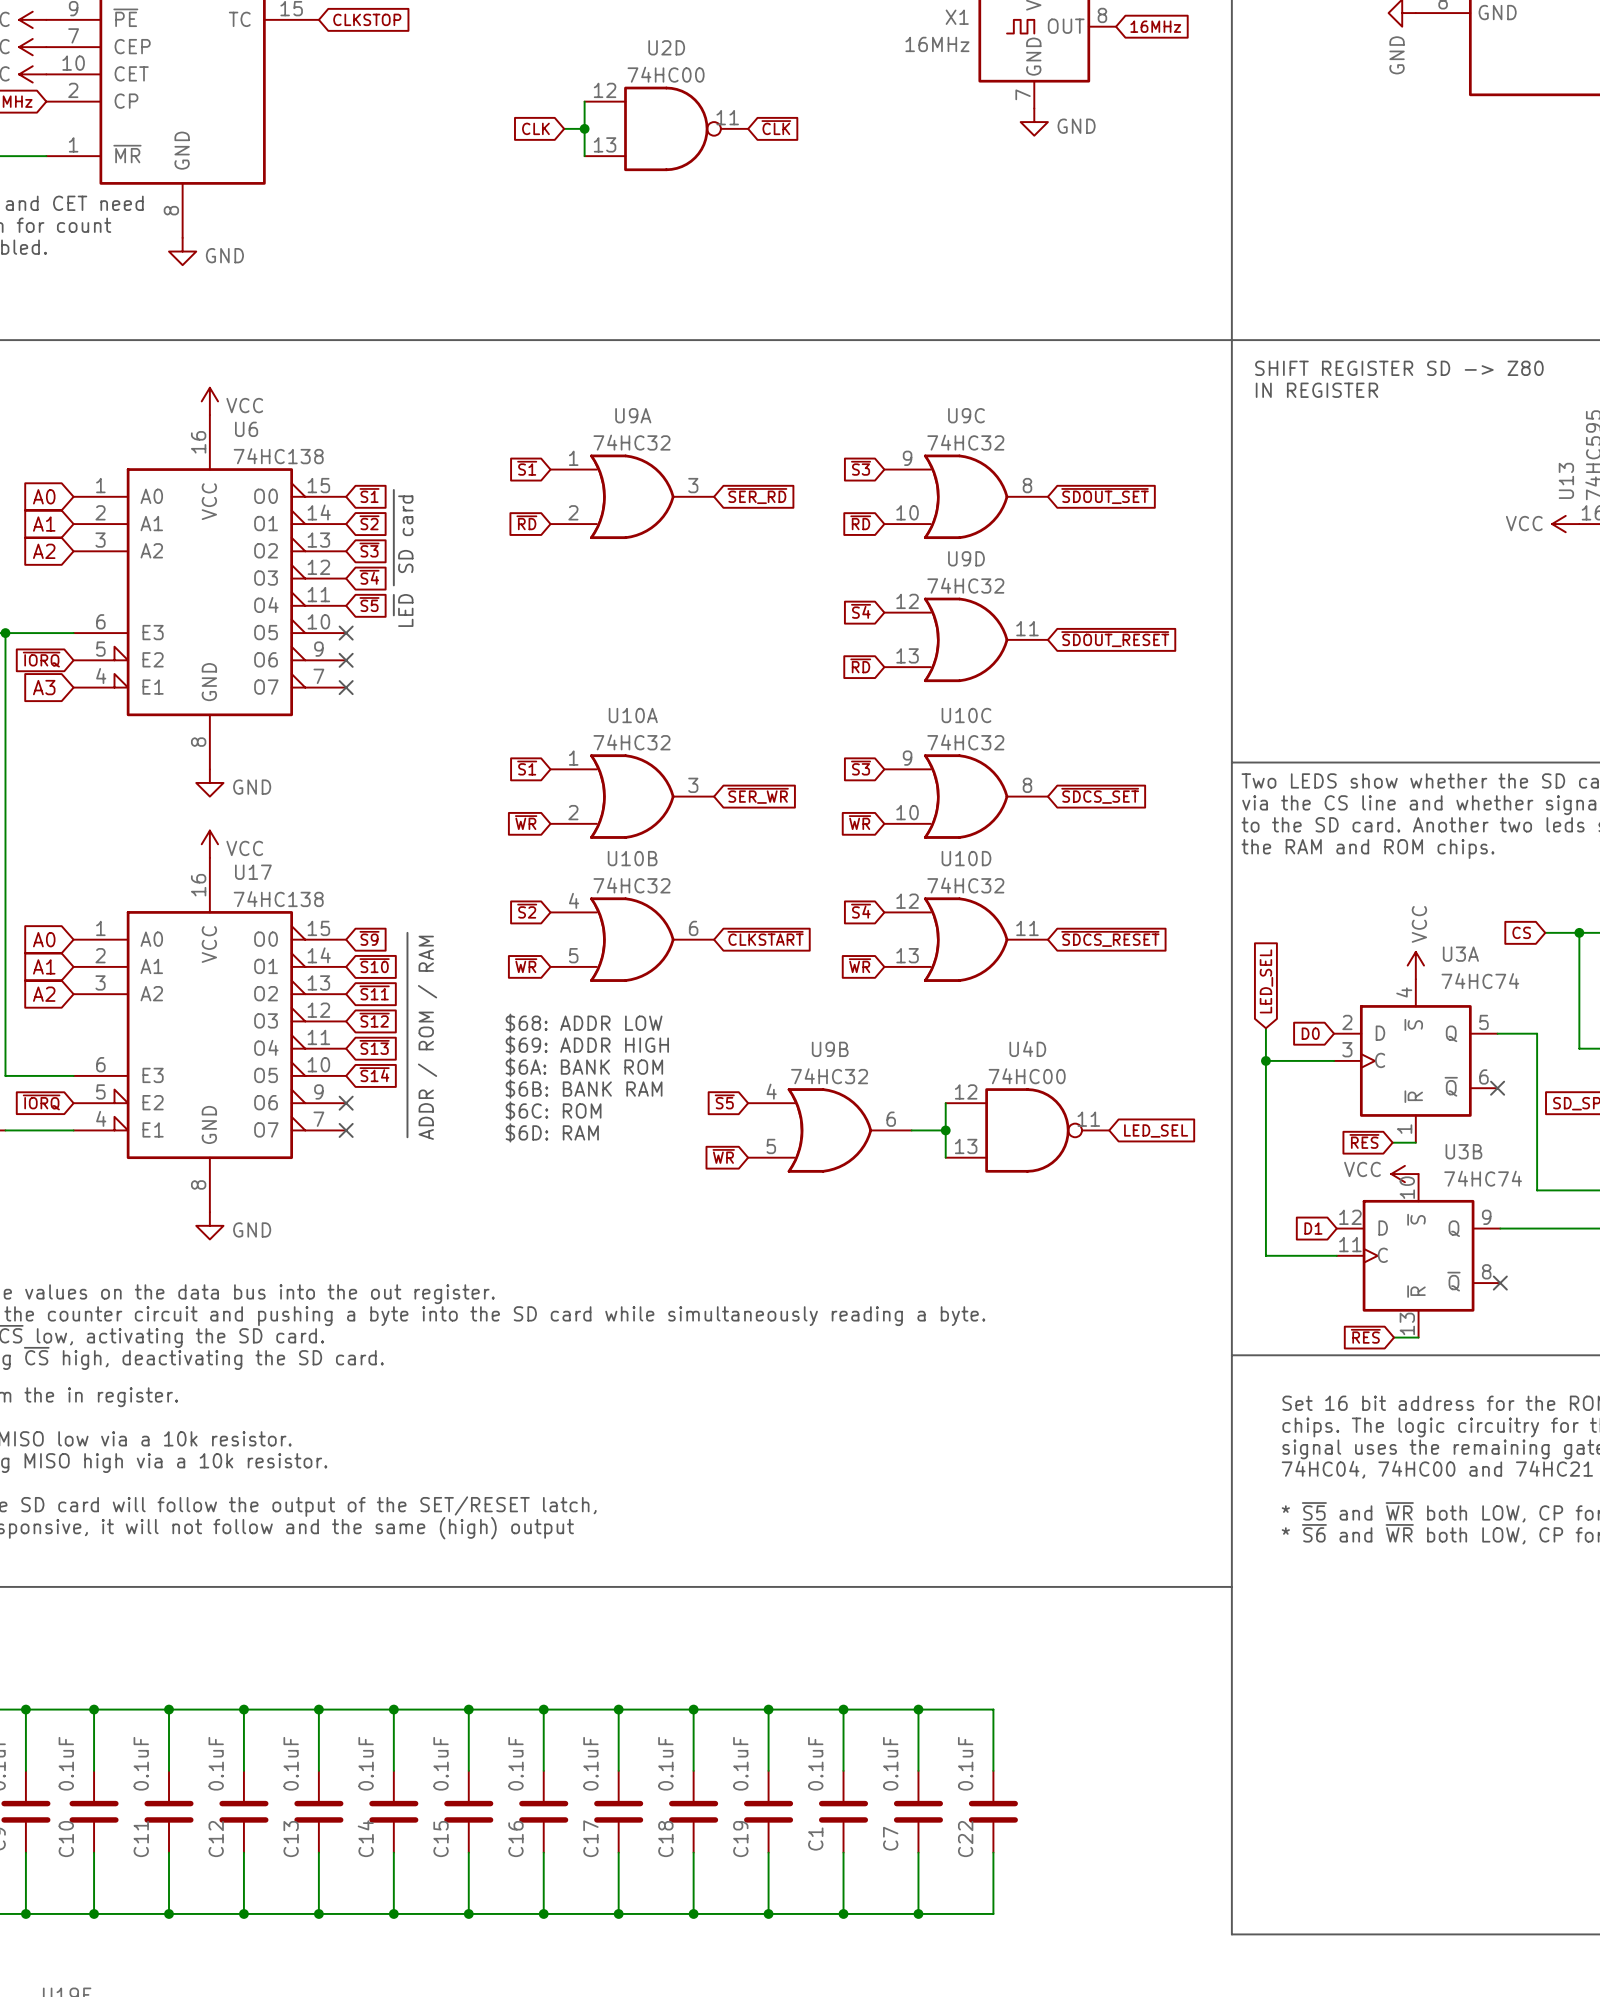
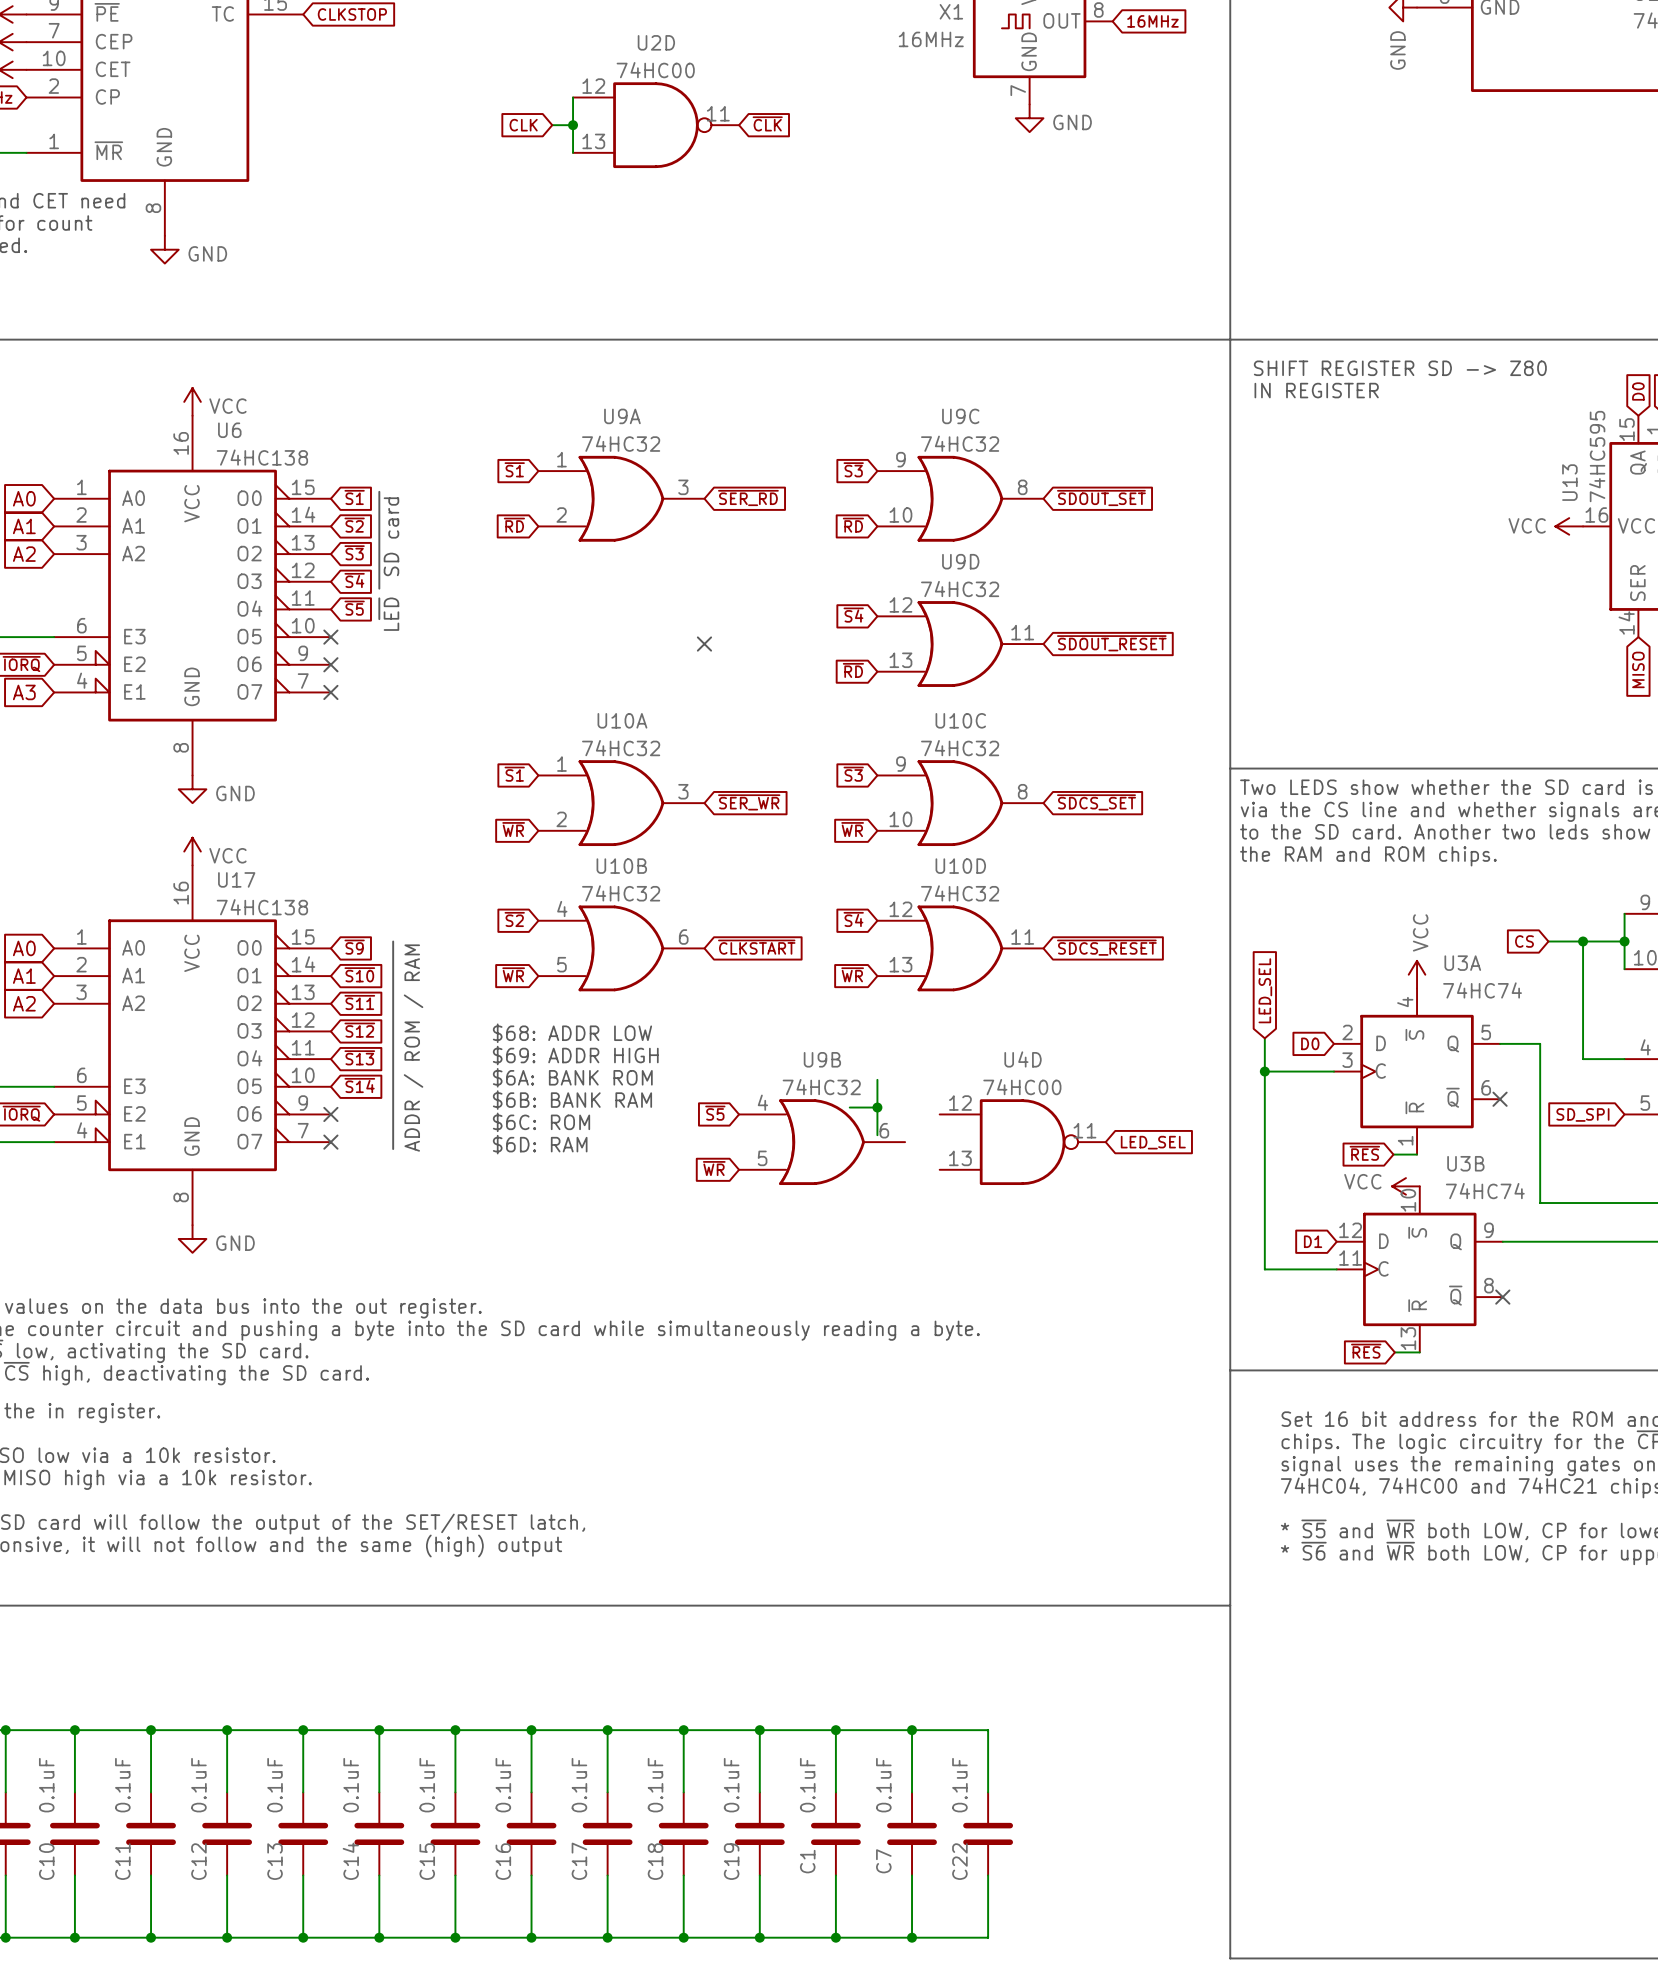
no-connect mark: none -> (704, 644)
wire: none -> (849, 1107) (877, 1107)
junction: none -> (877, 1107)
wire: (945, 1103) (945, 1157) -> (877, 1079) (877, 1135)
wire: (911, 1130) (945, 1130) -> none
junction: (945, 1130) -> none

